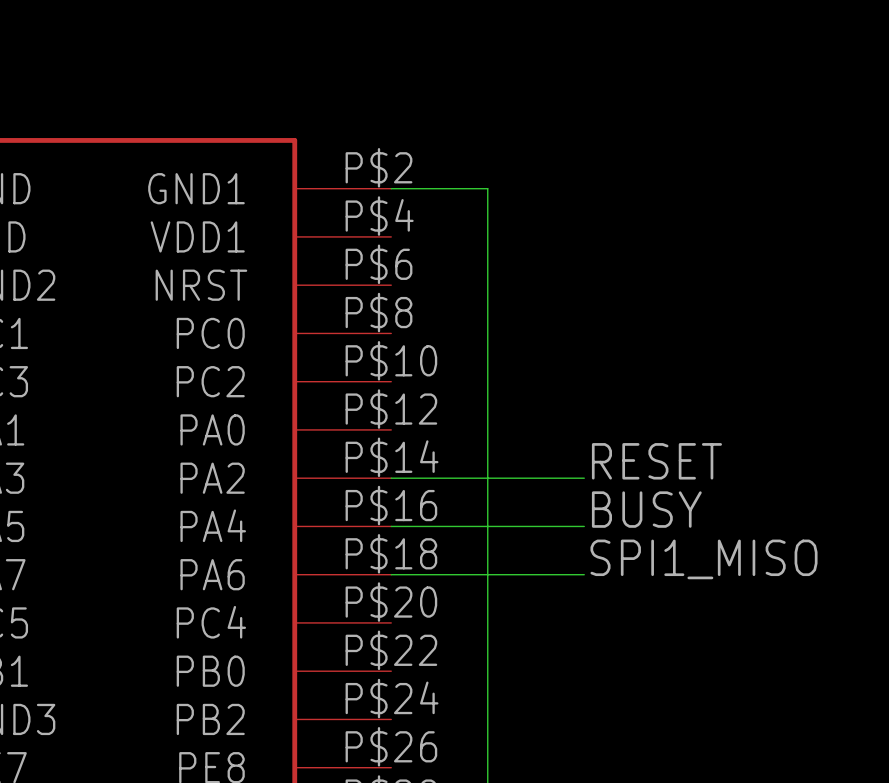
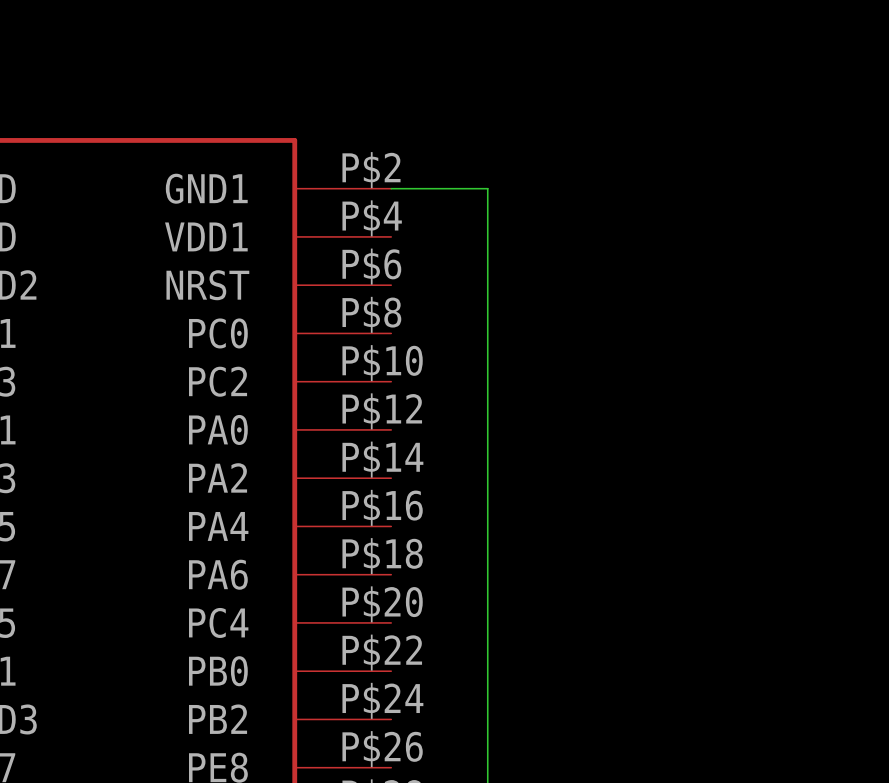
label: RESET (656, 461) -> none
wire: (391, 478) (584, 478) -> none
label: BUSY (646, 509) -> none
wire: (391, 526) (584, 526) -> none
label: SPI1_MISO (704, 559) -> none
wire: (391, 574) (584, 574) -> none

